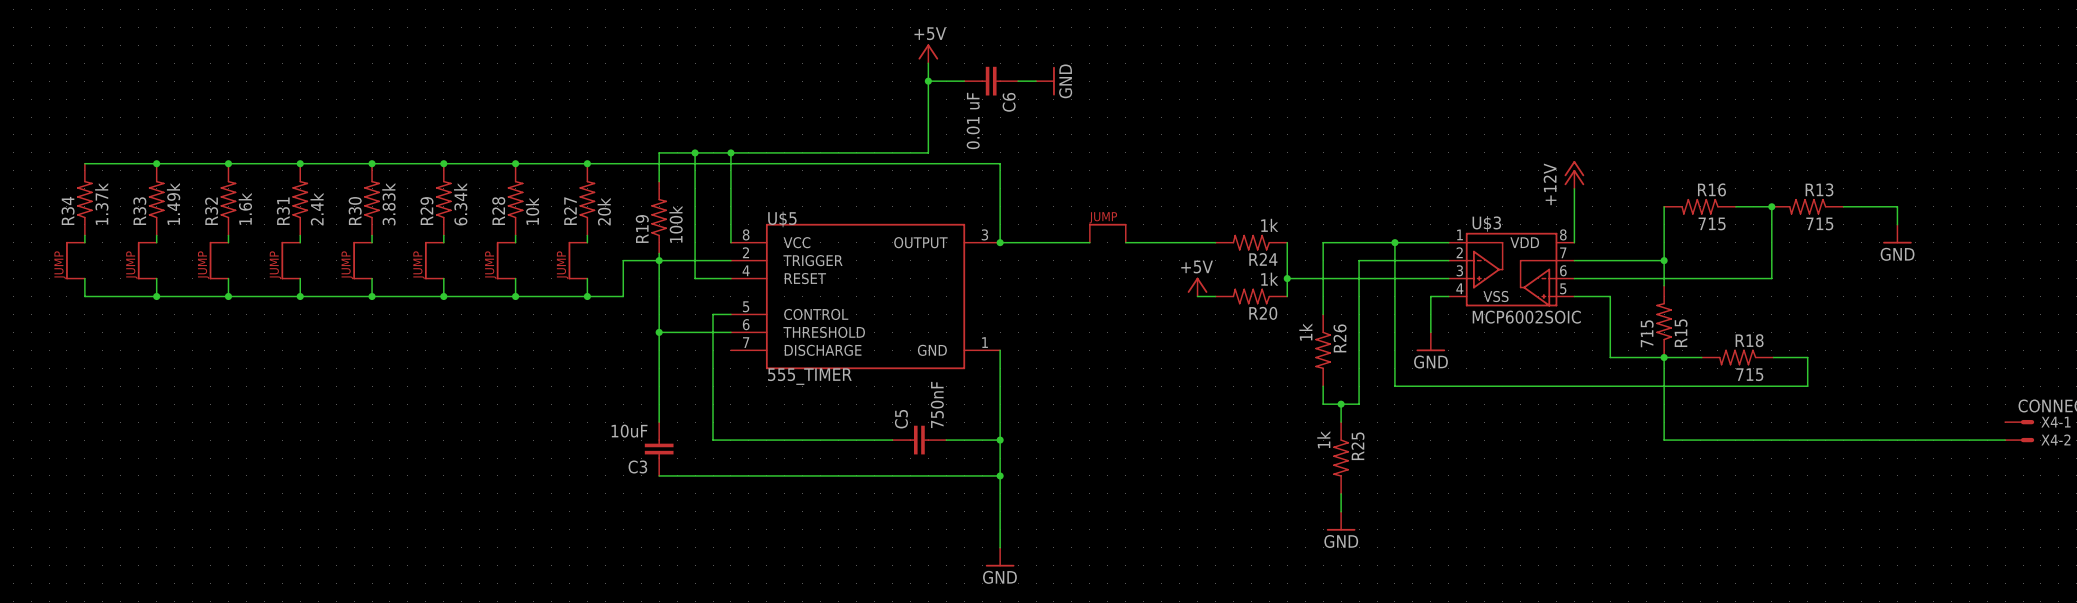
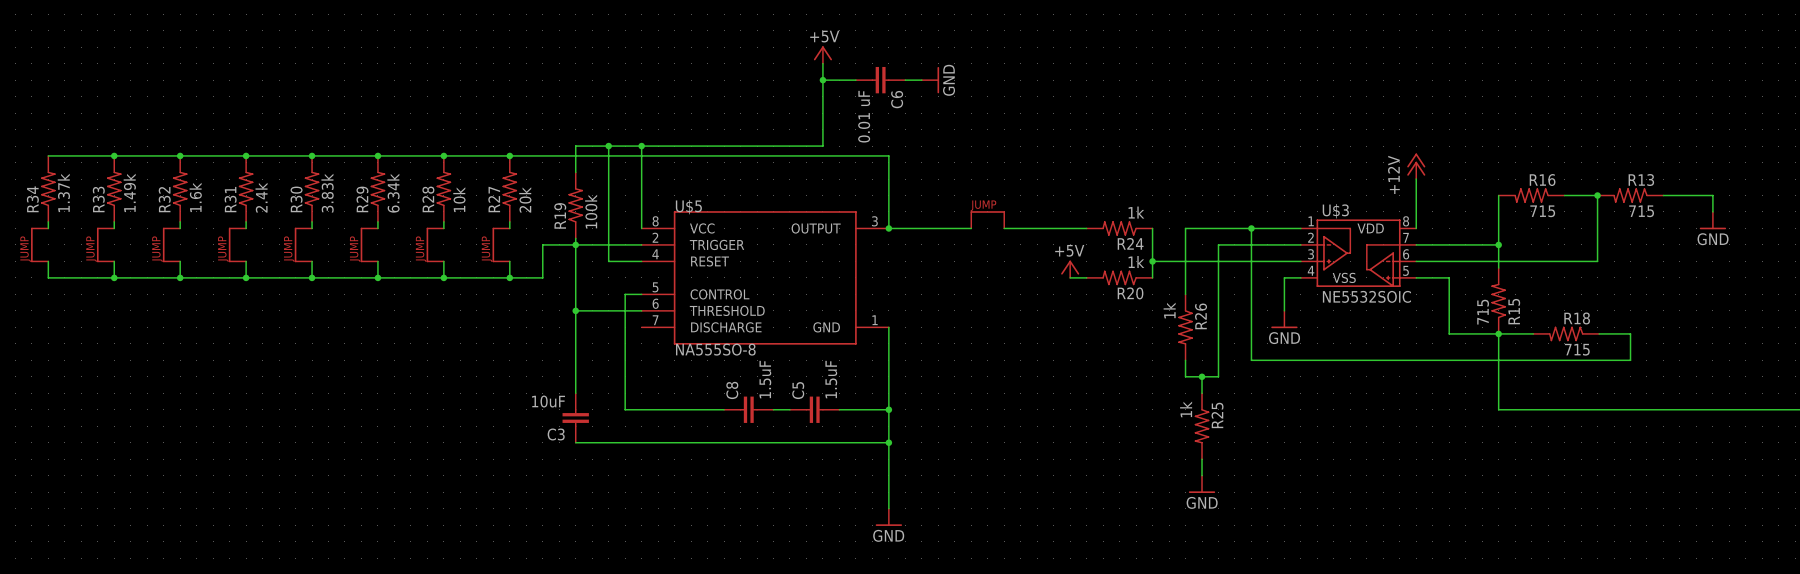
U$3 value: MCP6002SOIC (1526, 317) -> NE5532SOIC (1366, 296)
U$5 value: 555_TIMER (809, 376) -> NA555SO-8 (715, 349)
C5 value: 750nF (937, 404) -> 1.5uF (831, 379)
C8: none -> 1.5uF (748, 409)

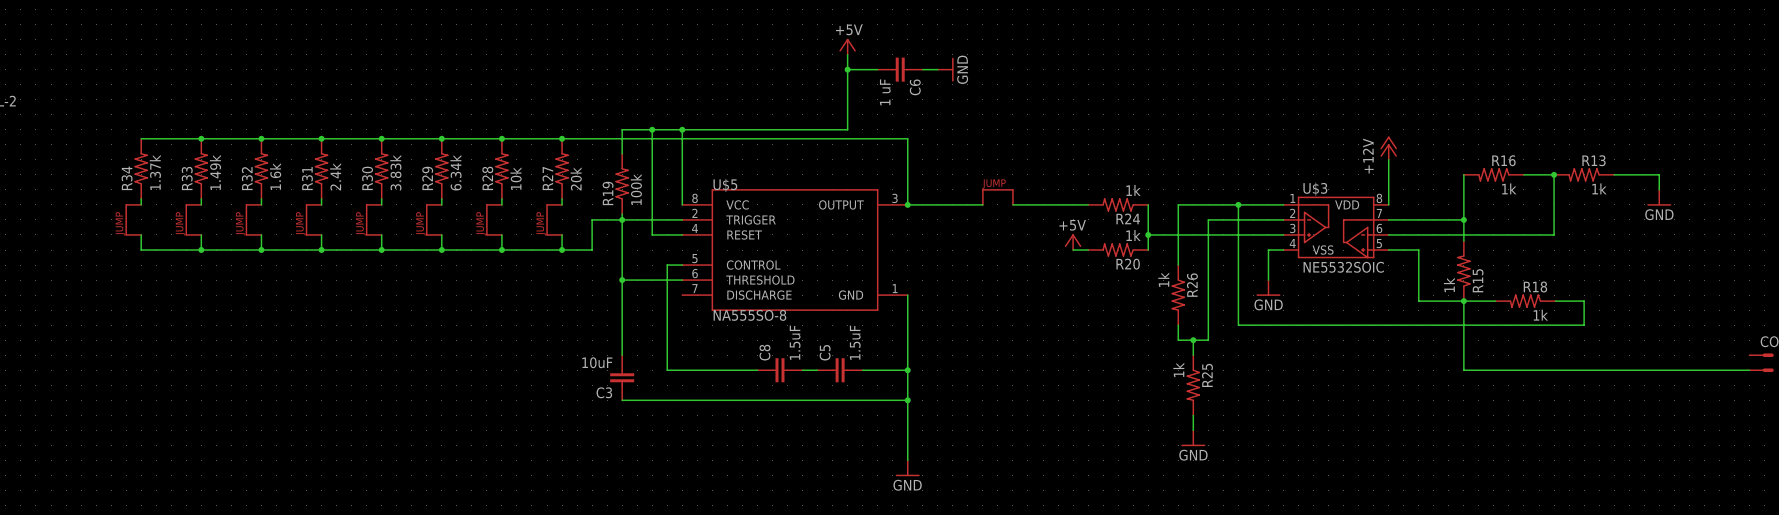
C6 value: 0.01 uF (864, 116) -> 1 uF (885, 92)
R16 value: 715 (1542, 211) -> 1k (1509, 188)
R13 value: 715 (1641, 211) -> 1k (1599, 188)
R15 value: 715 (1483, 312) -> 1k (1449, 285)
R18 value: 715 (1577, 349) -> 1k (1540, 315)

